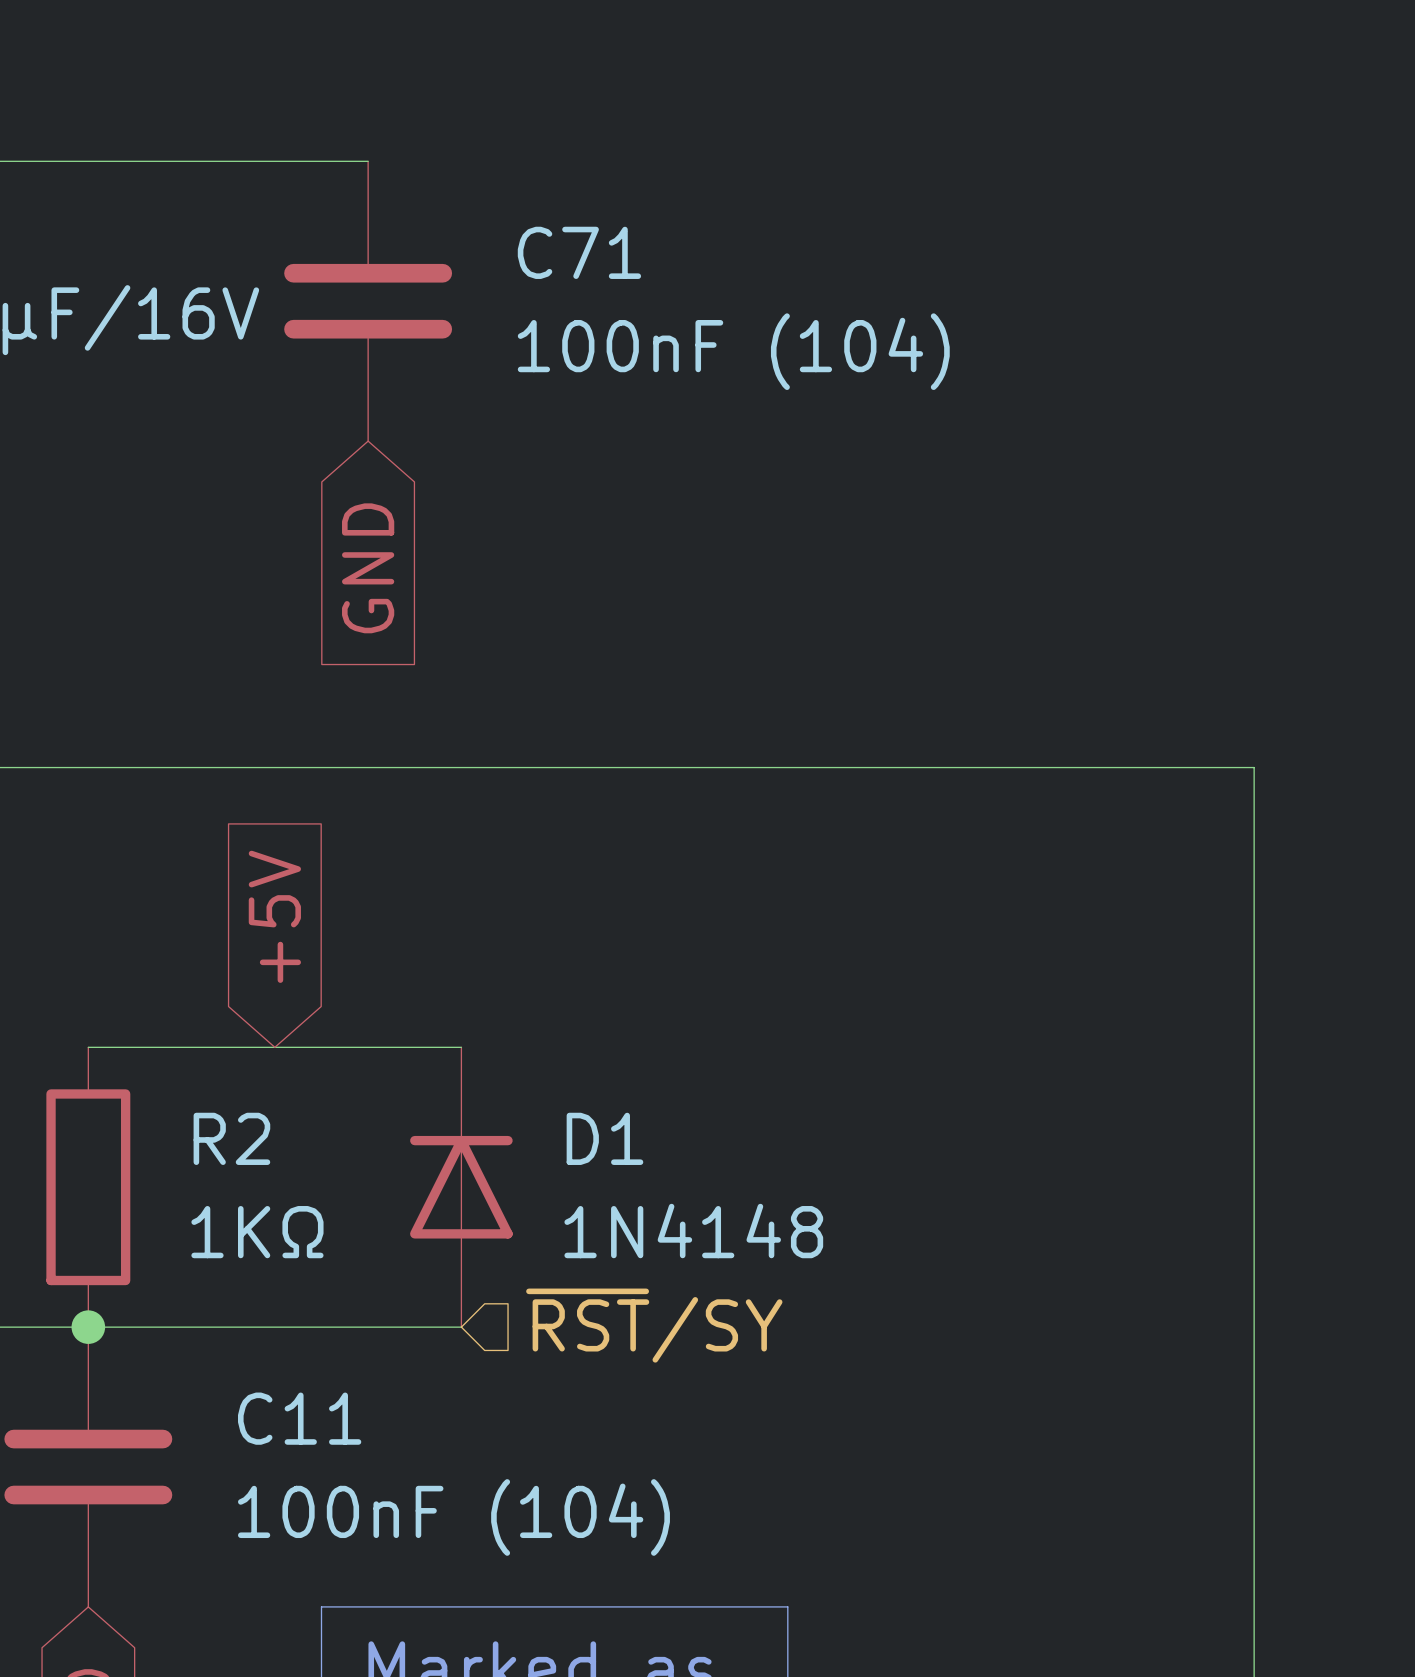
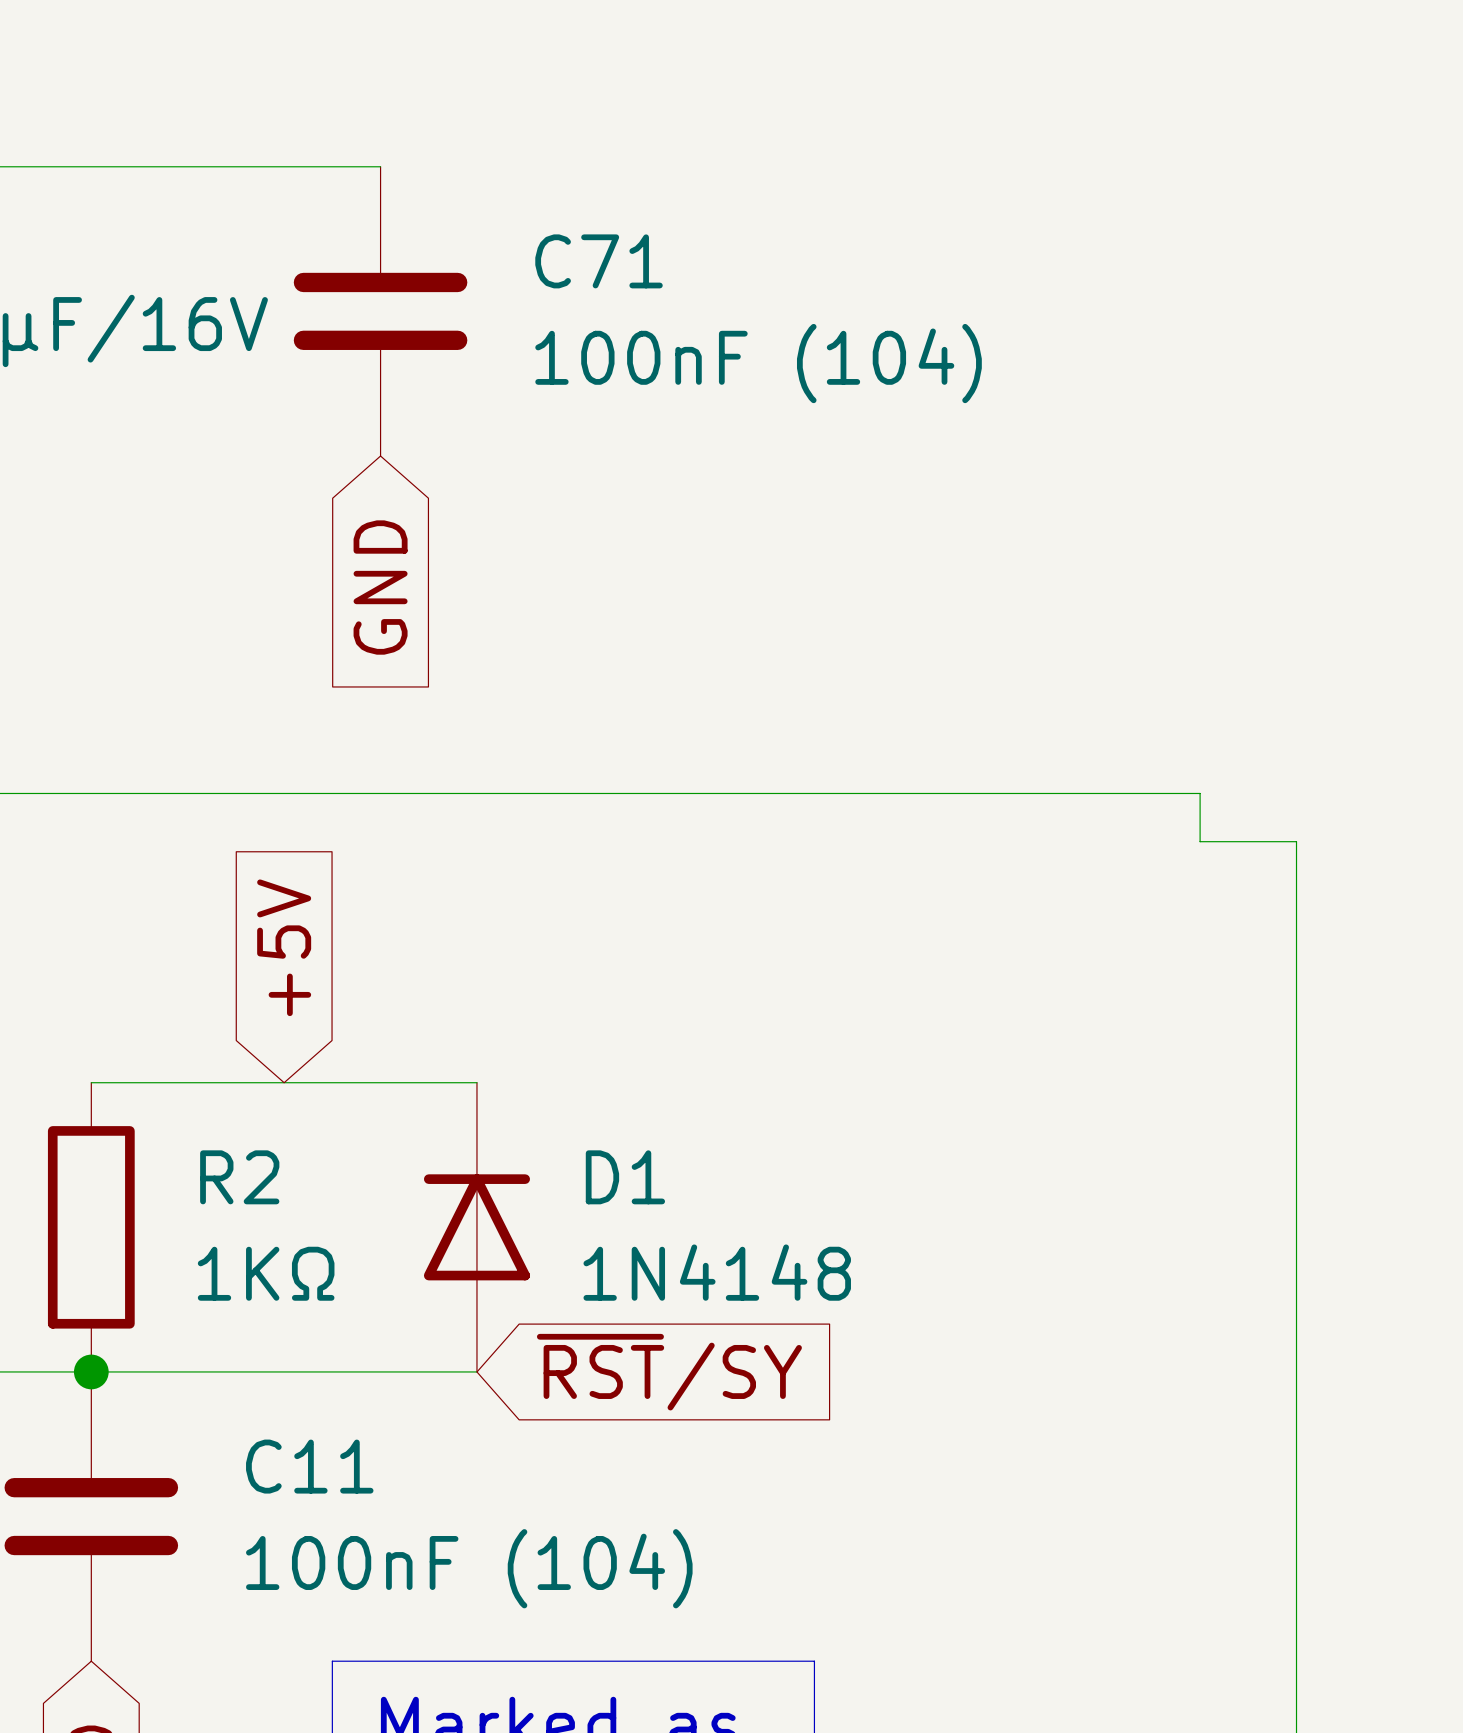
wire: (1160, 767) (1254, 767) (1254, 814) -> (1200, 793) (1200, 841) (1296, 841)
hierarchical label: ~{RST}/SY (654, 1325) -> none
global label: none -> ~{RST}/SY (669, 1372)

